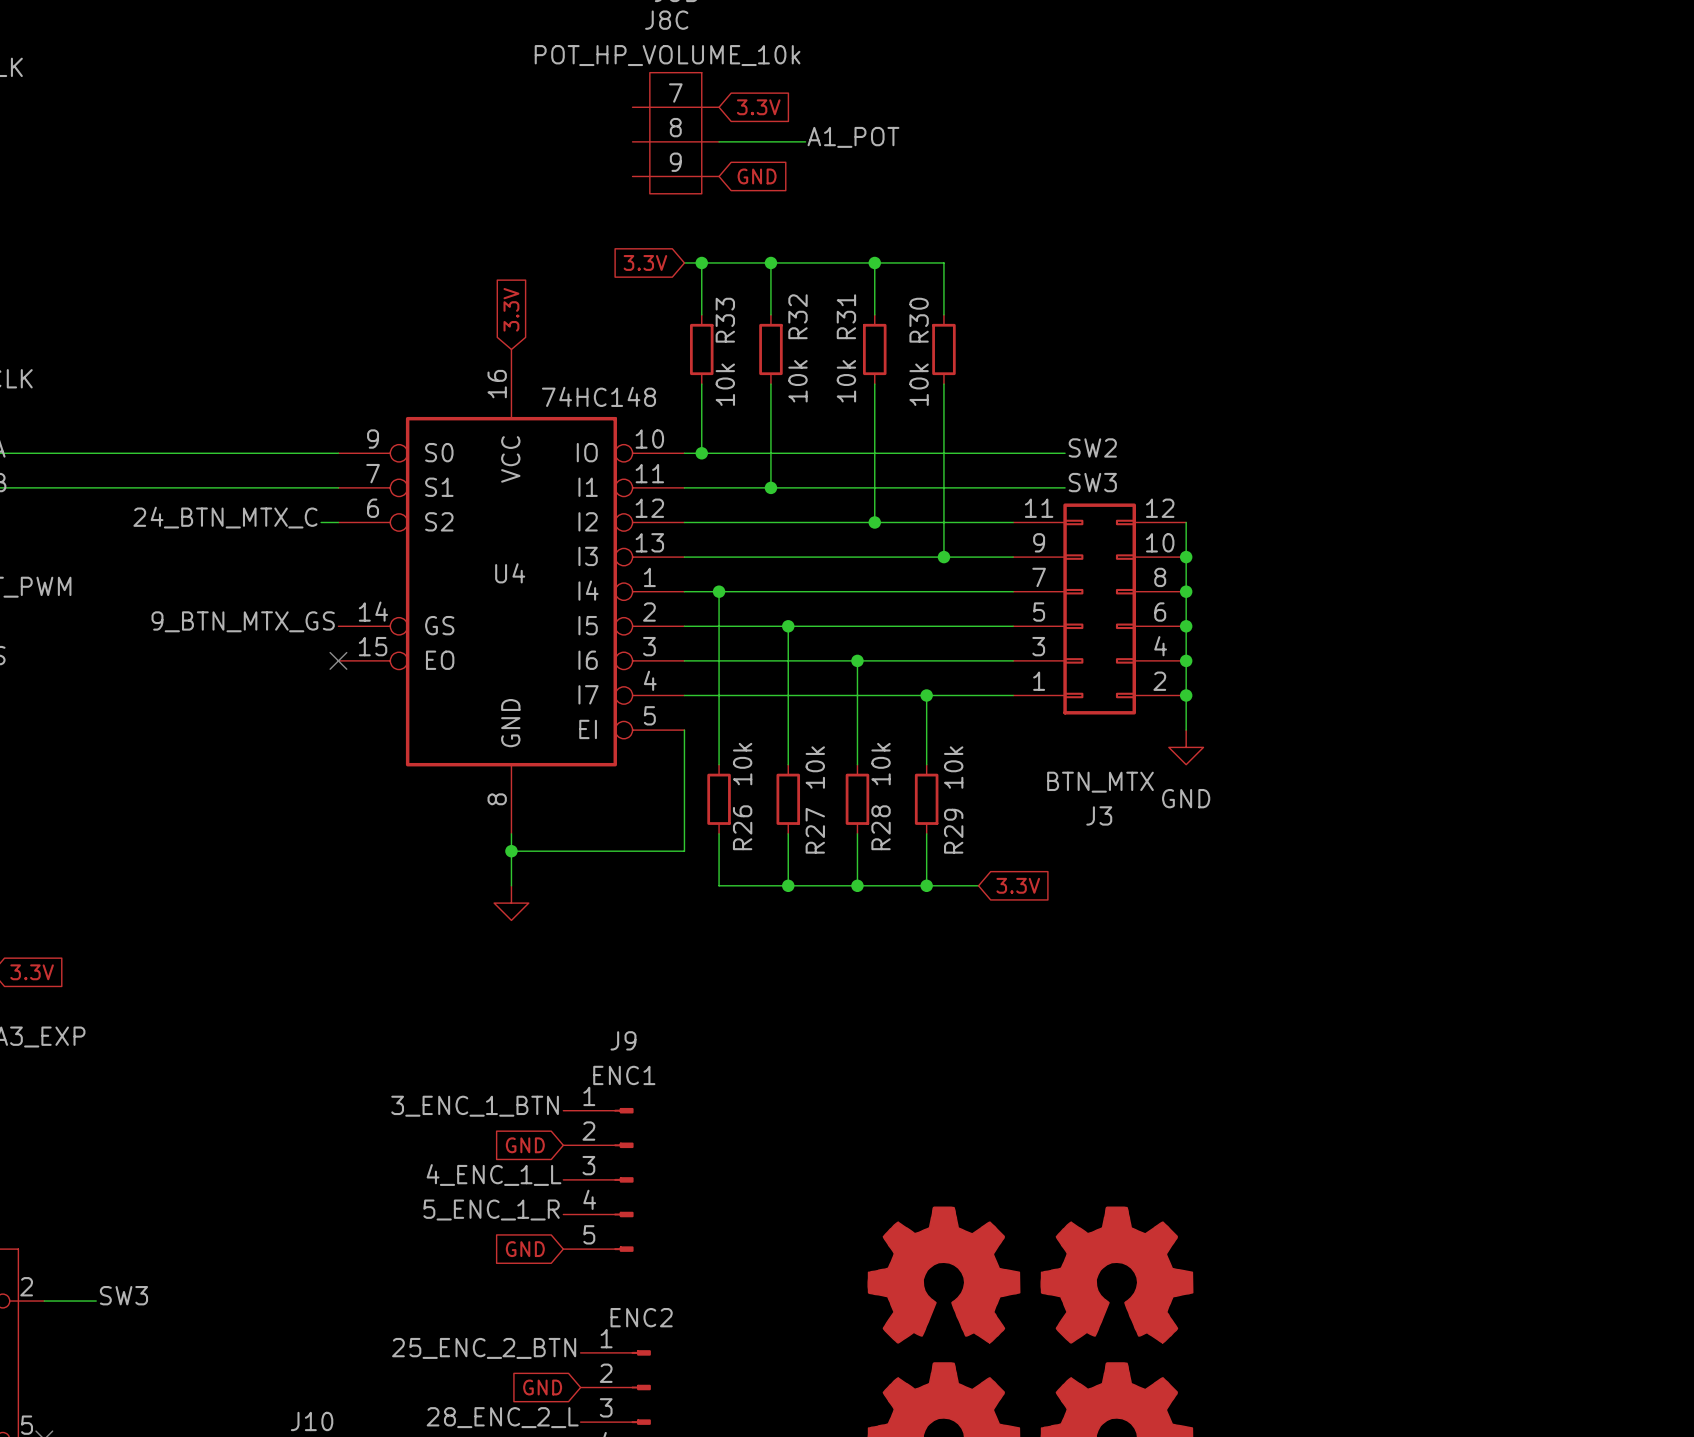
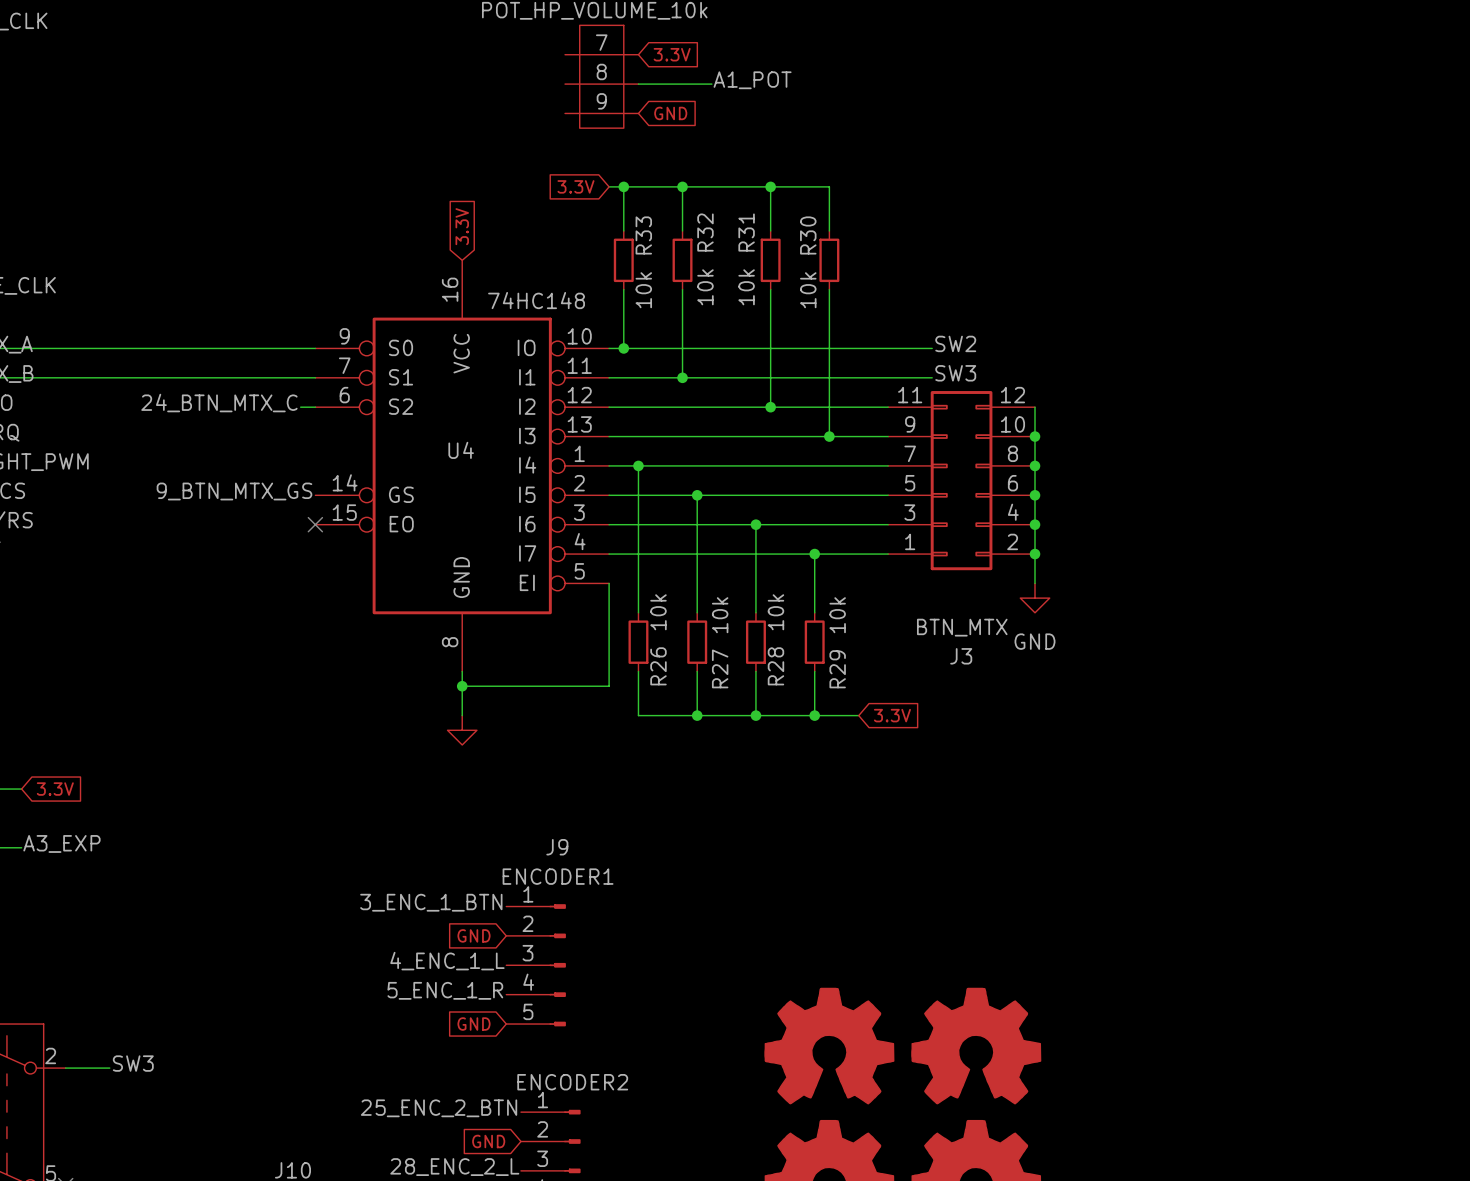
J9 value: ENC1 (624, 1075) -> ENCODER1 (558, 876)
J10 value: ENC2 (641, 1317) -> ENCODER2 (572, 1082)

